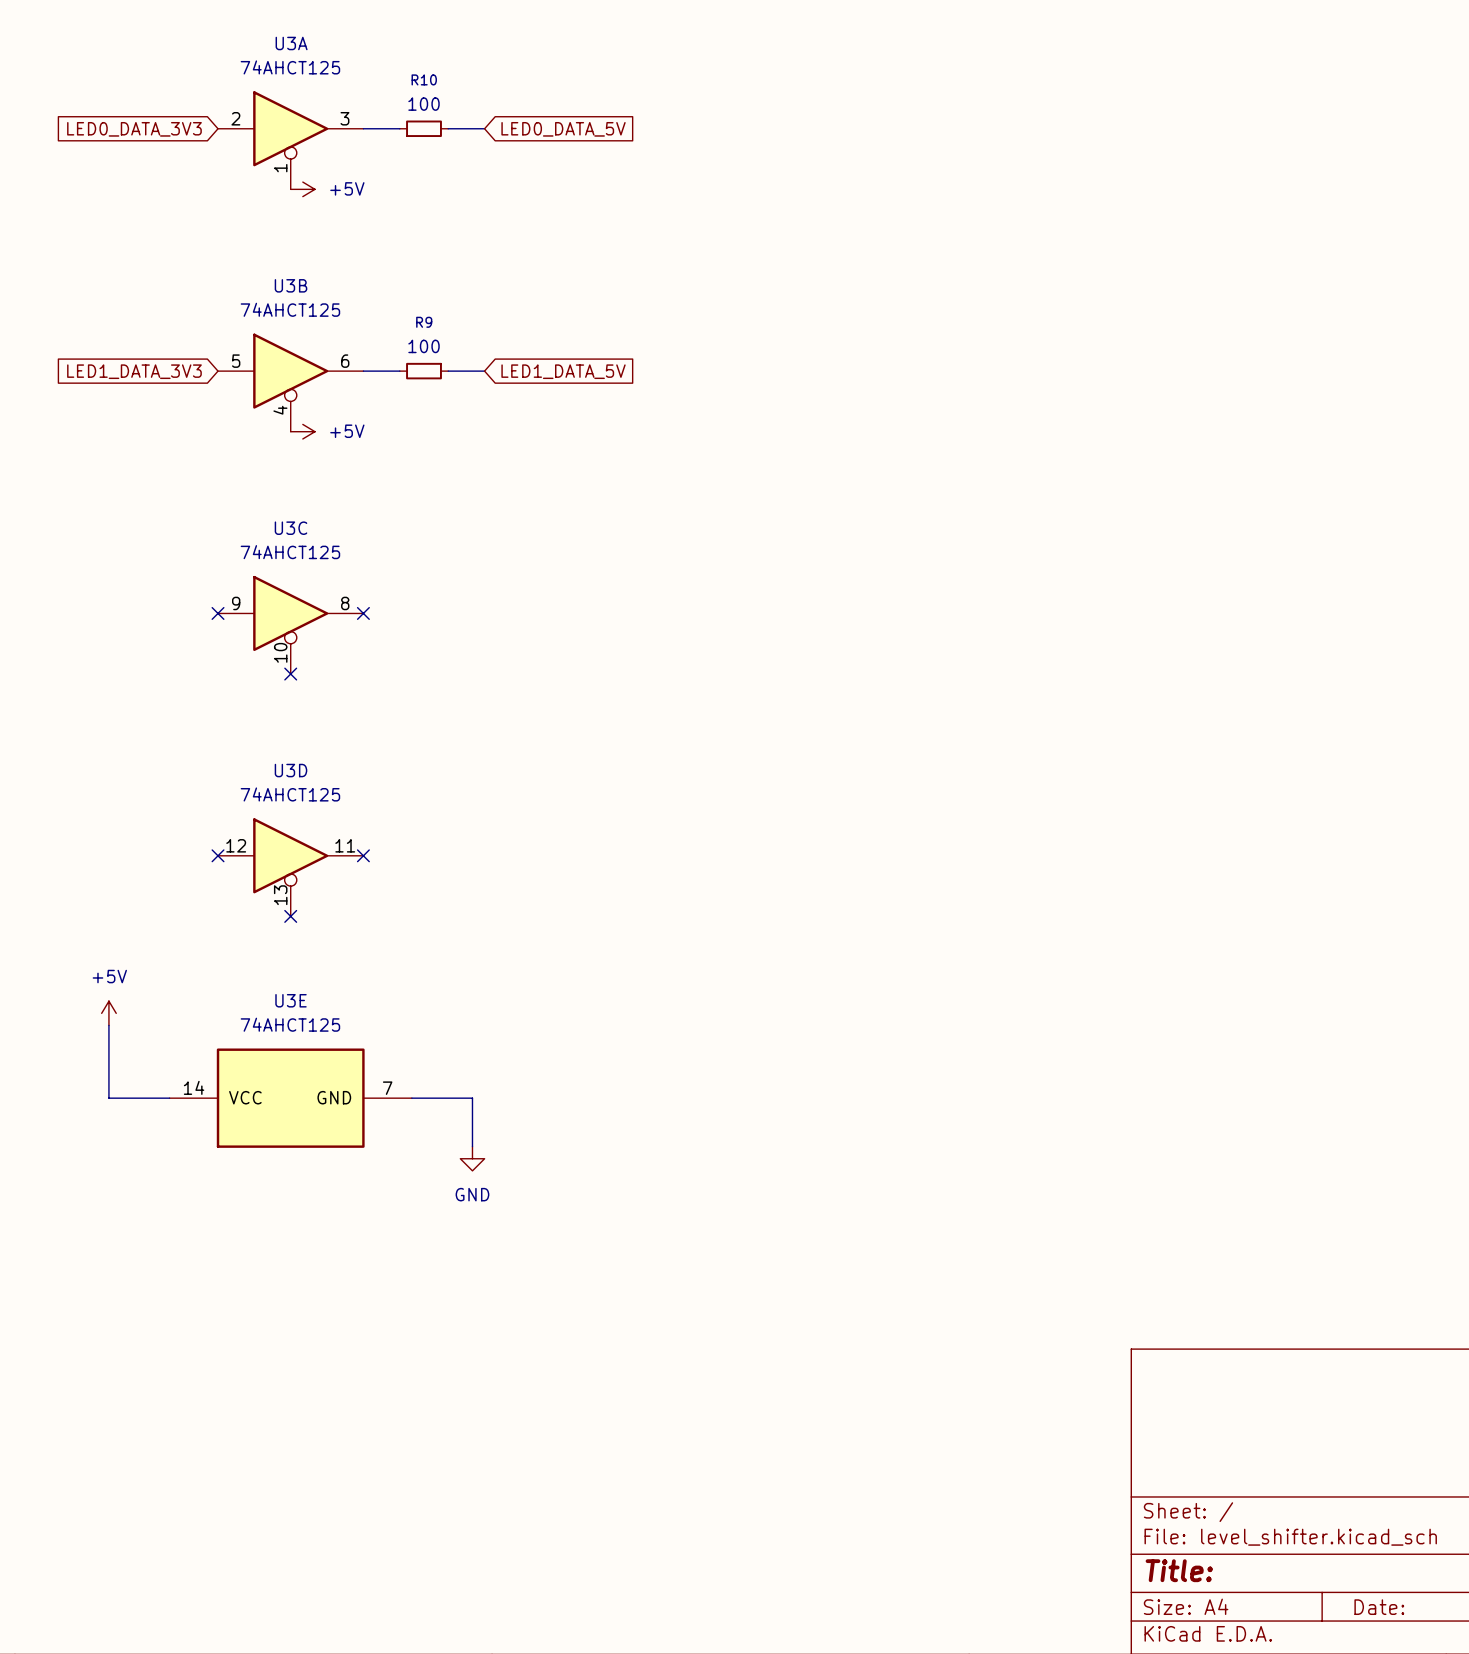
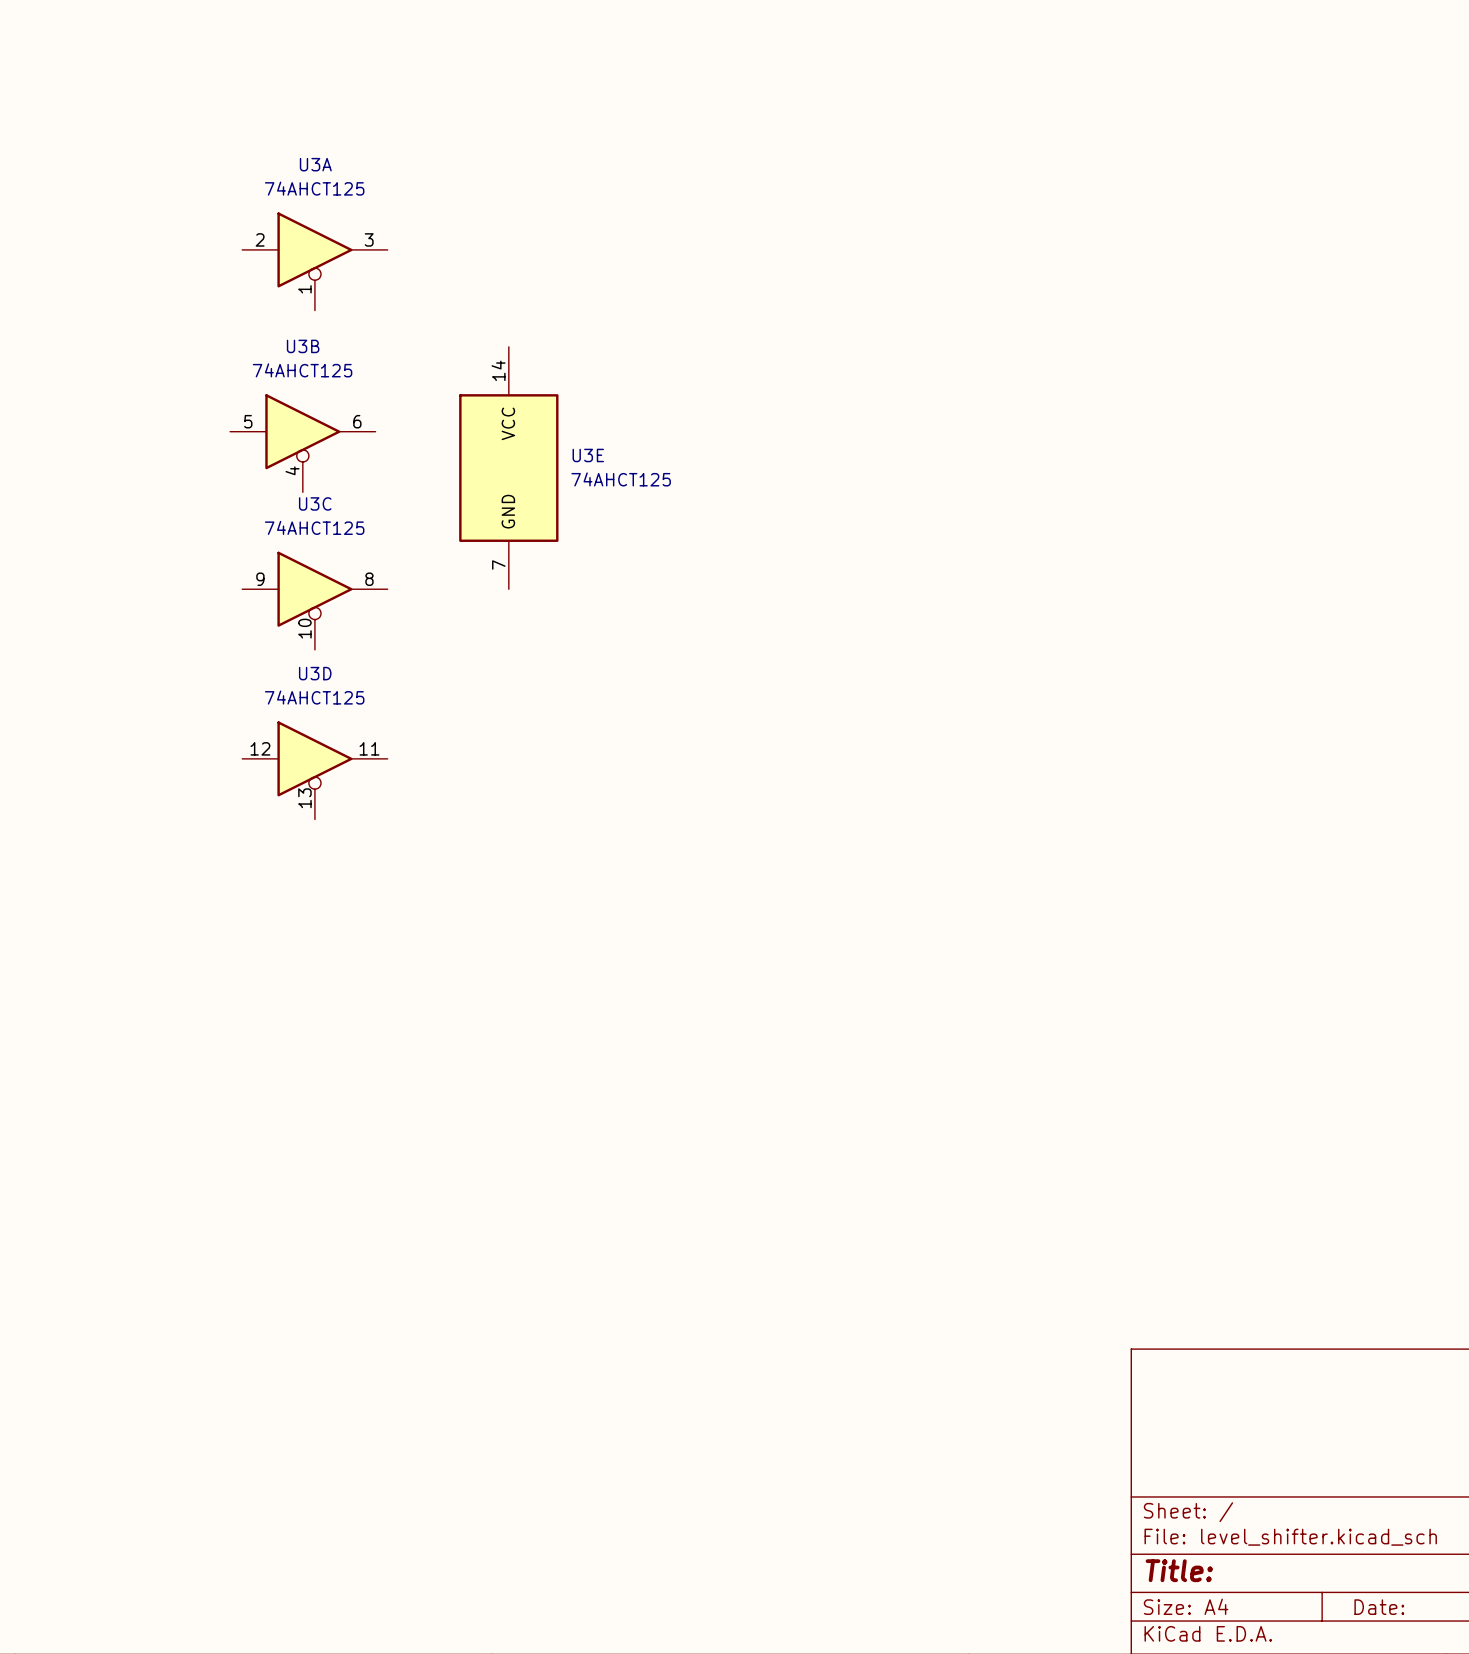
wire: (363, 128) (399, 128) -> none
R10: 100 (424, 128) -> none
wire: (448, 128) (484, 128) -> none
global label: LED0_DATA_3V3 (134, 129) -> none
global label: LED0_DATA_5V (563, 129) -> none
U3A position: (290, 140) -> (314, 261)
power symbol: +5V (302, 189) -> none
global label: LED1_DATA_3V3 (134, 371) -> none
wire: (363, 371) (399, 371) -> none
R9: 100 (424, 371) -> none
wire: (448, 371) (484, 371) -> none
global label: LED1_DATA_5V (563, 371) -> none
U3B position: (290, 382) -> (302, 443)
power symbol: +5V (302, 431) -> none
no-connect mark: (218, 613) -> none
no-connect mark: (363, 613) -> none
U3C position: (290, 624) -> (314, 600)
no-connect mark: (290, 674) -> none
no-connect mark: (218, 855) -> none
no-connect mark: (363, 855) -> none
U3D position: (290, 867) -> (314, 770)
no-connect mark: (290, 916) -> none
U3E name position: U3E (291, 1000) -> U3E (588, 455)
power symbol: +5V (108, 1013) -> none
U3E value position: 74AHCT125 (290, 1024) -> 74AHCT125 (621, 479)
wire: (108, 1025) (108, 1098) (169, 1098) -> none
U3E rotation: 0° (290, 1098) -> 90° clockwise (508, 468)
U3E position: (290, 1098) -> (508, 468)
wire: (411, 1098) (472, 1098) (472, 1146) -> none
power symbol: GND (472, 1158) -> none

